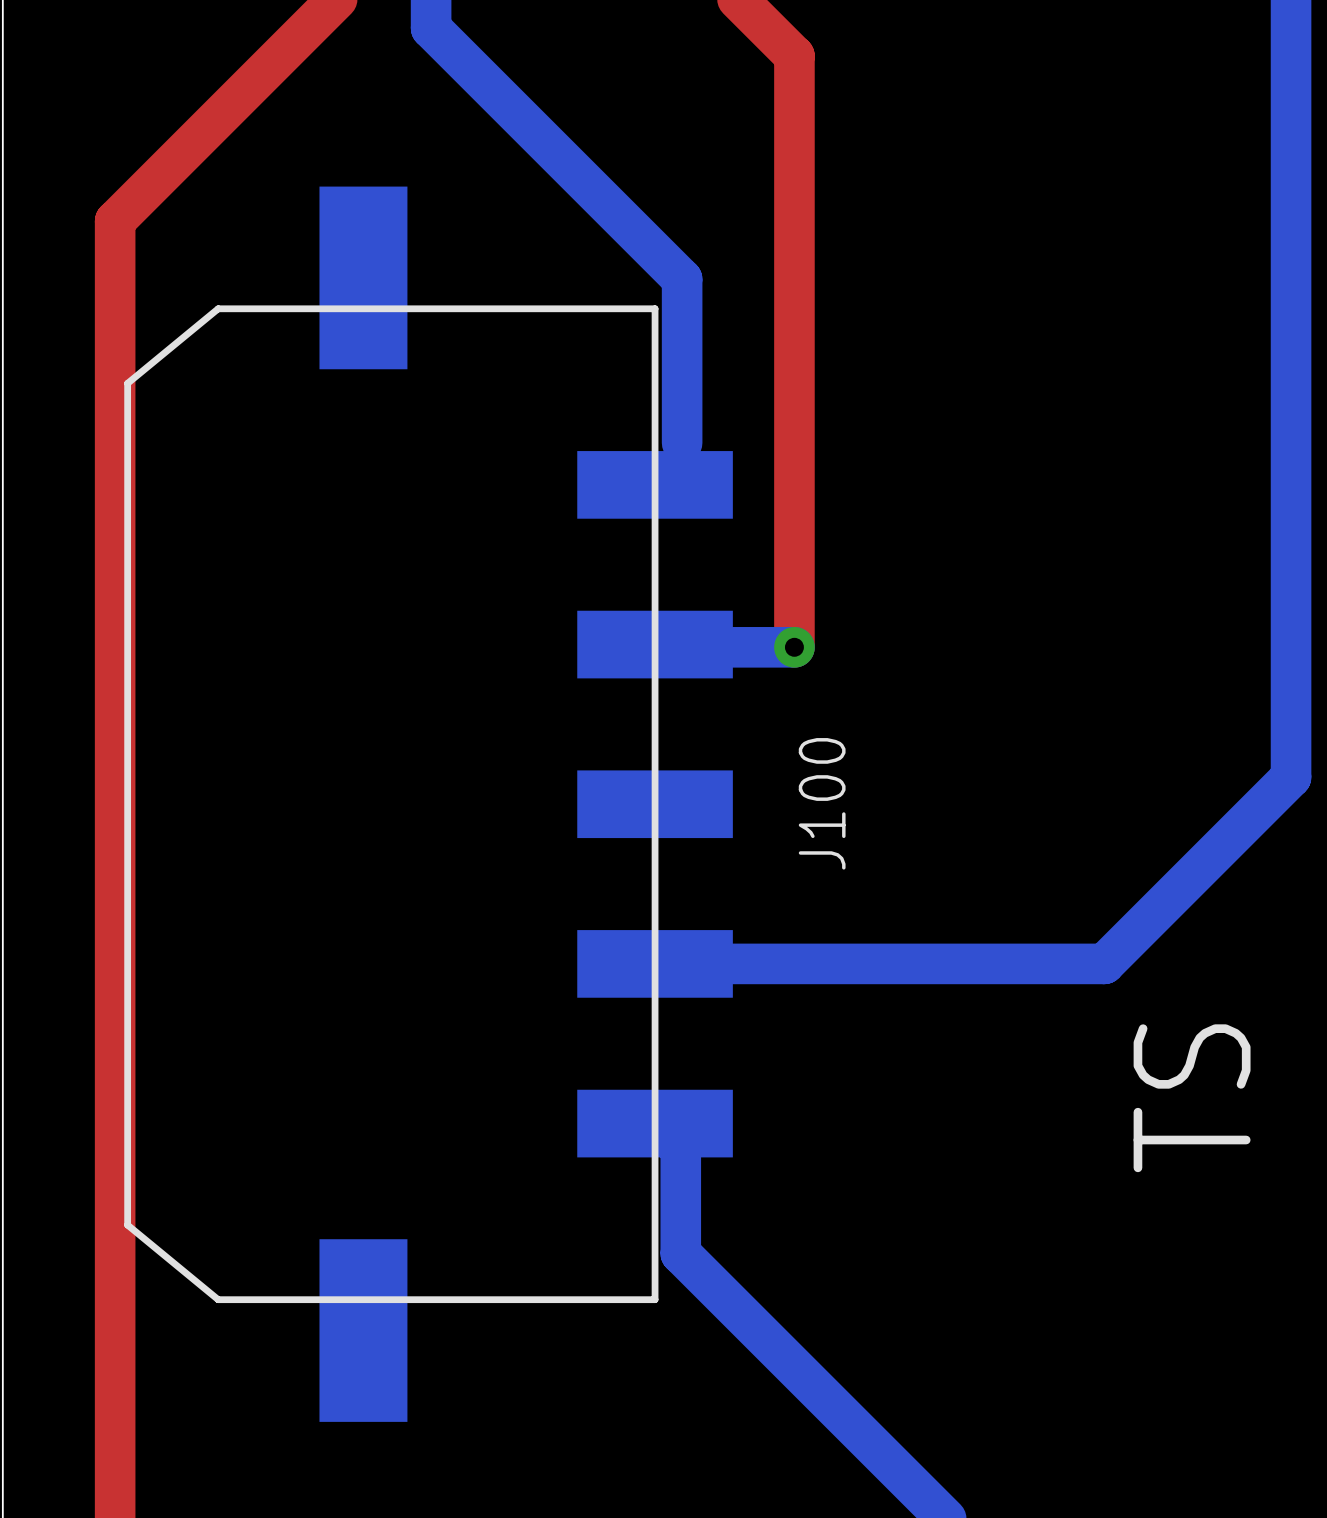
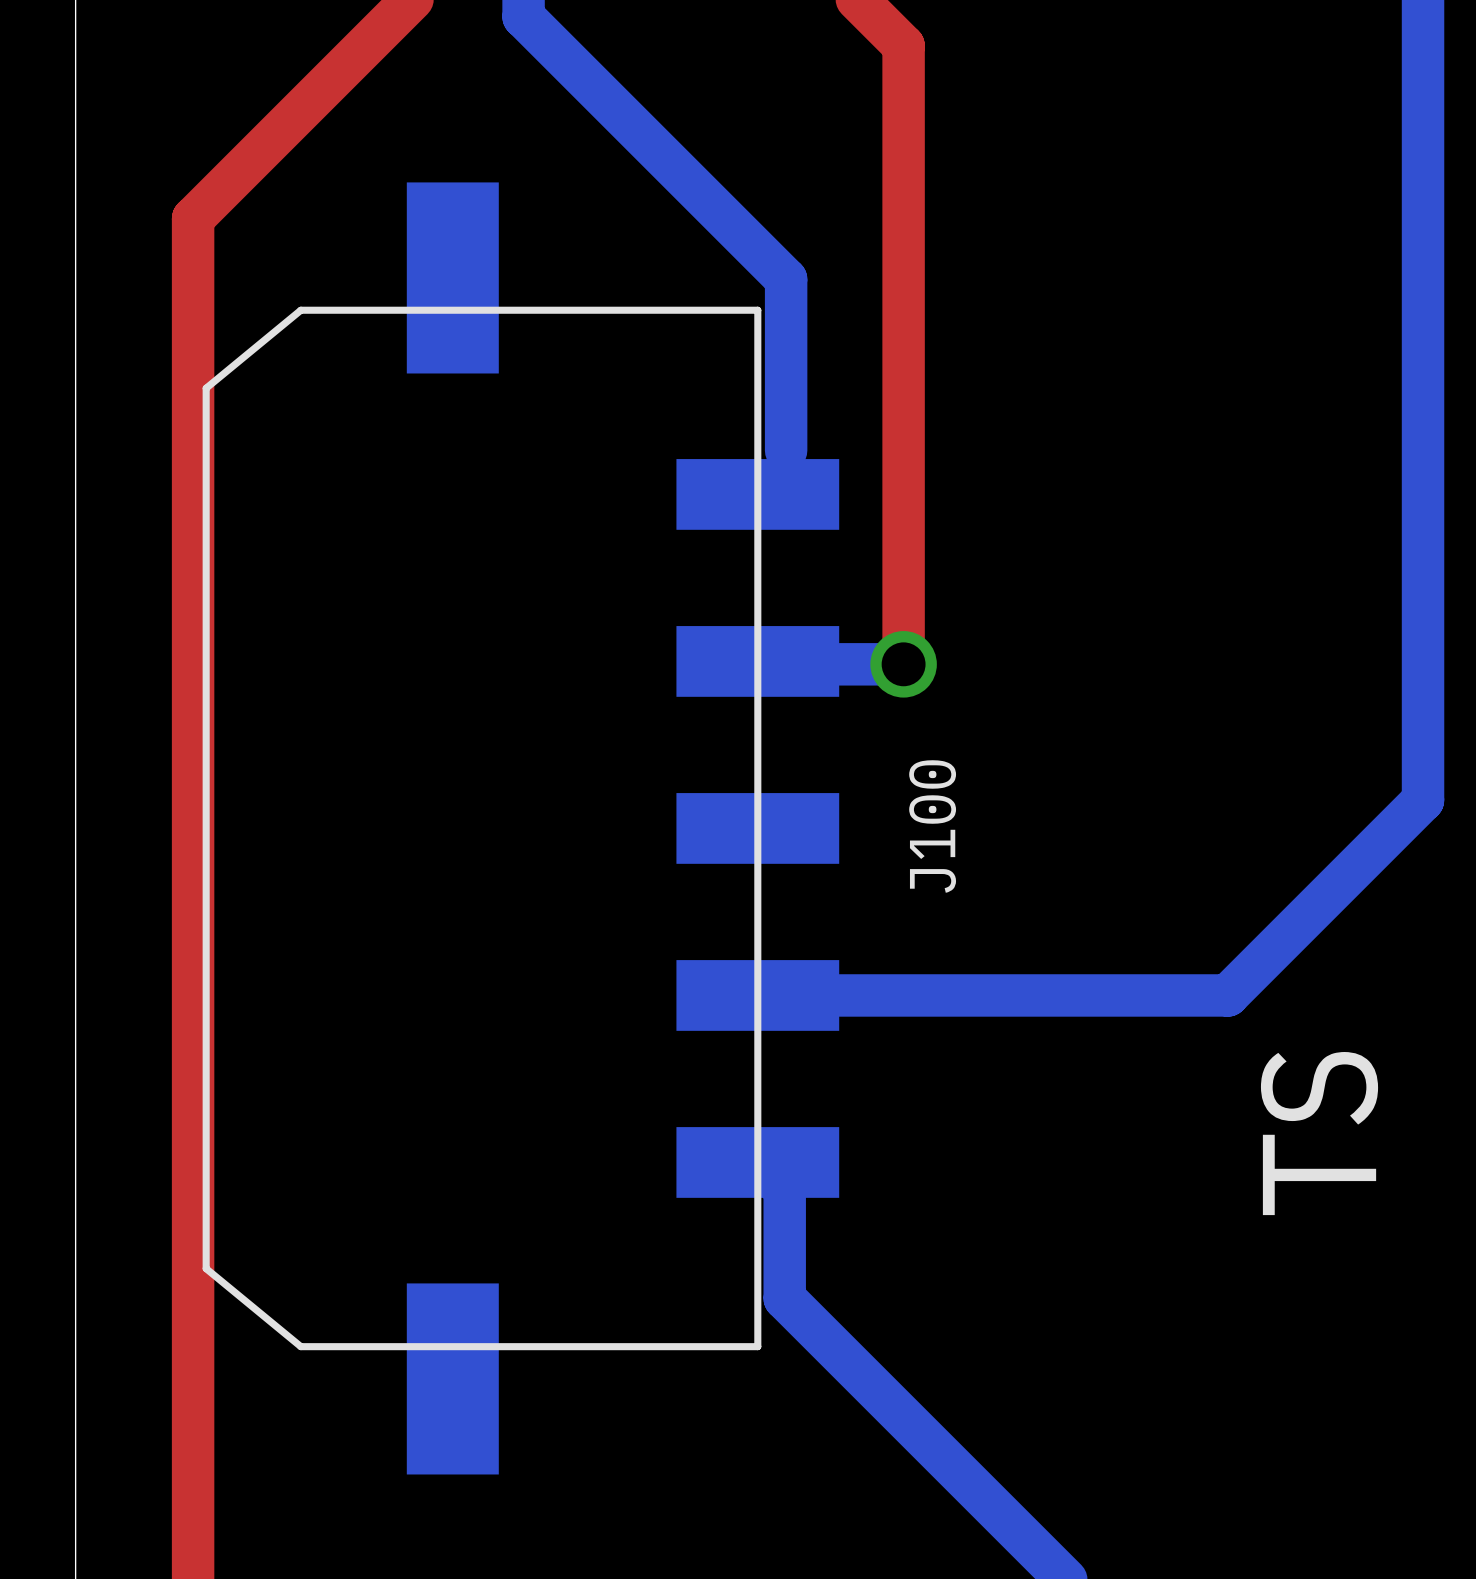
via size: [774, 627, 815, 668] -> [870, 631, 937, 698]

